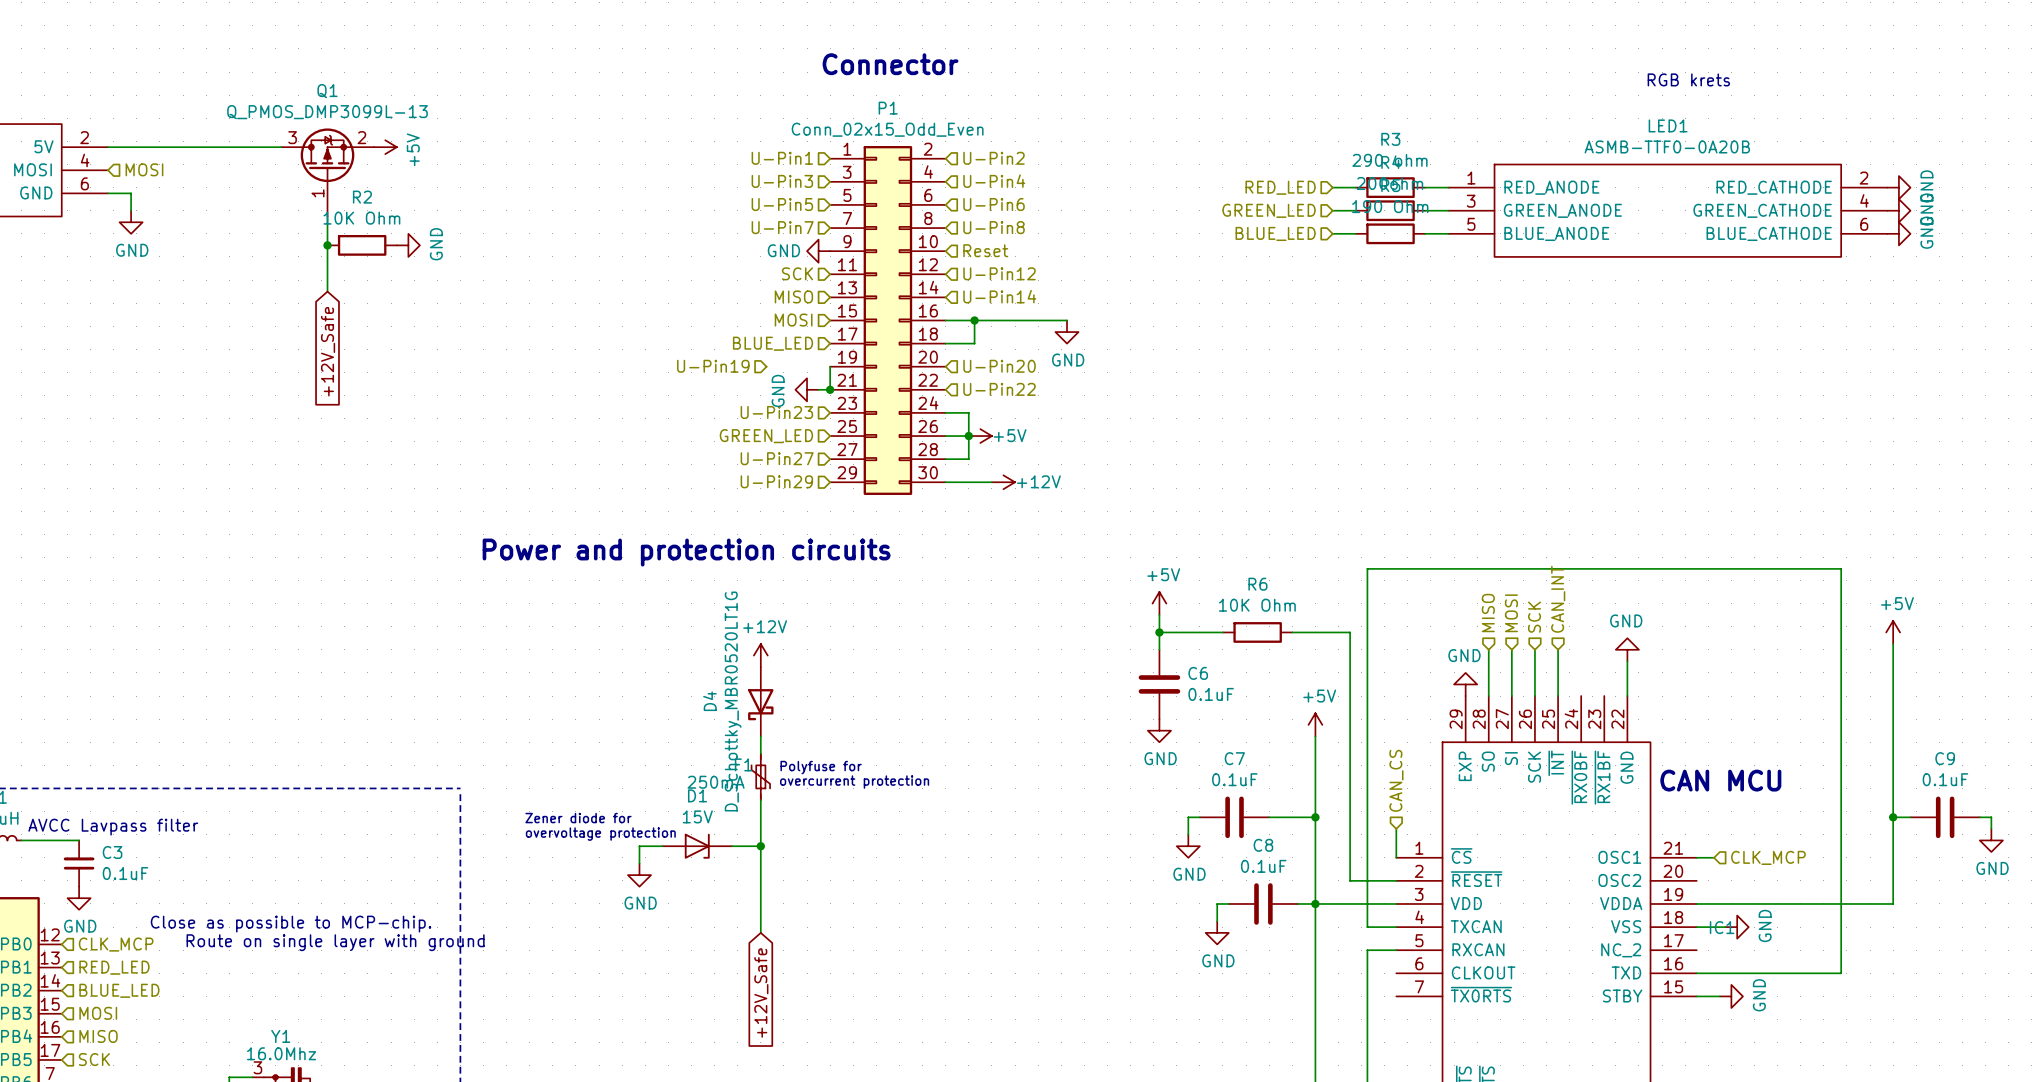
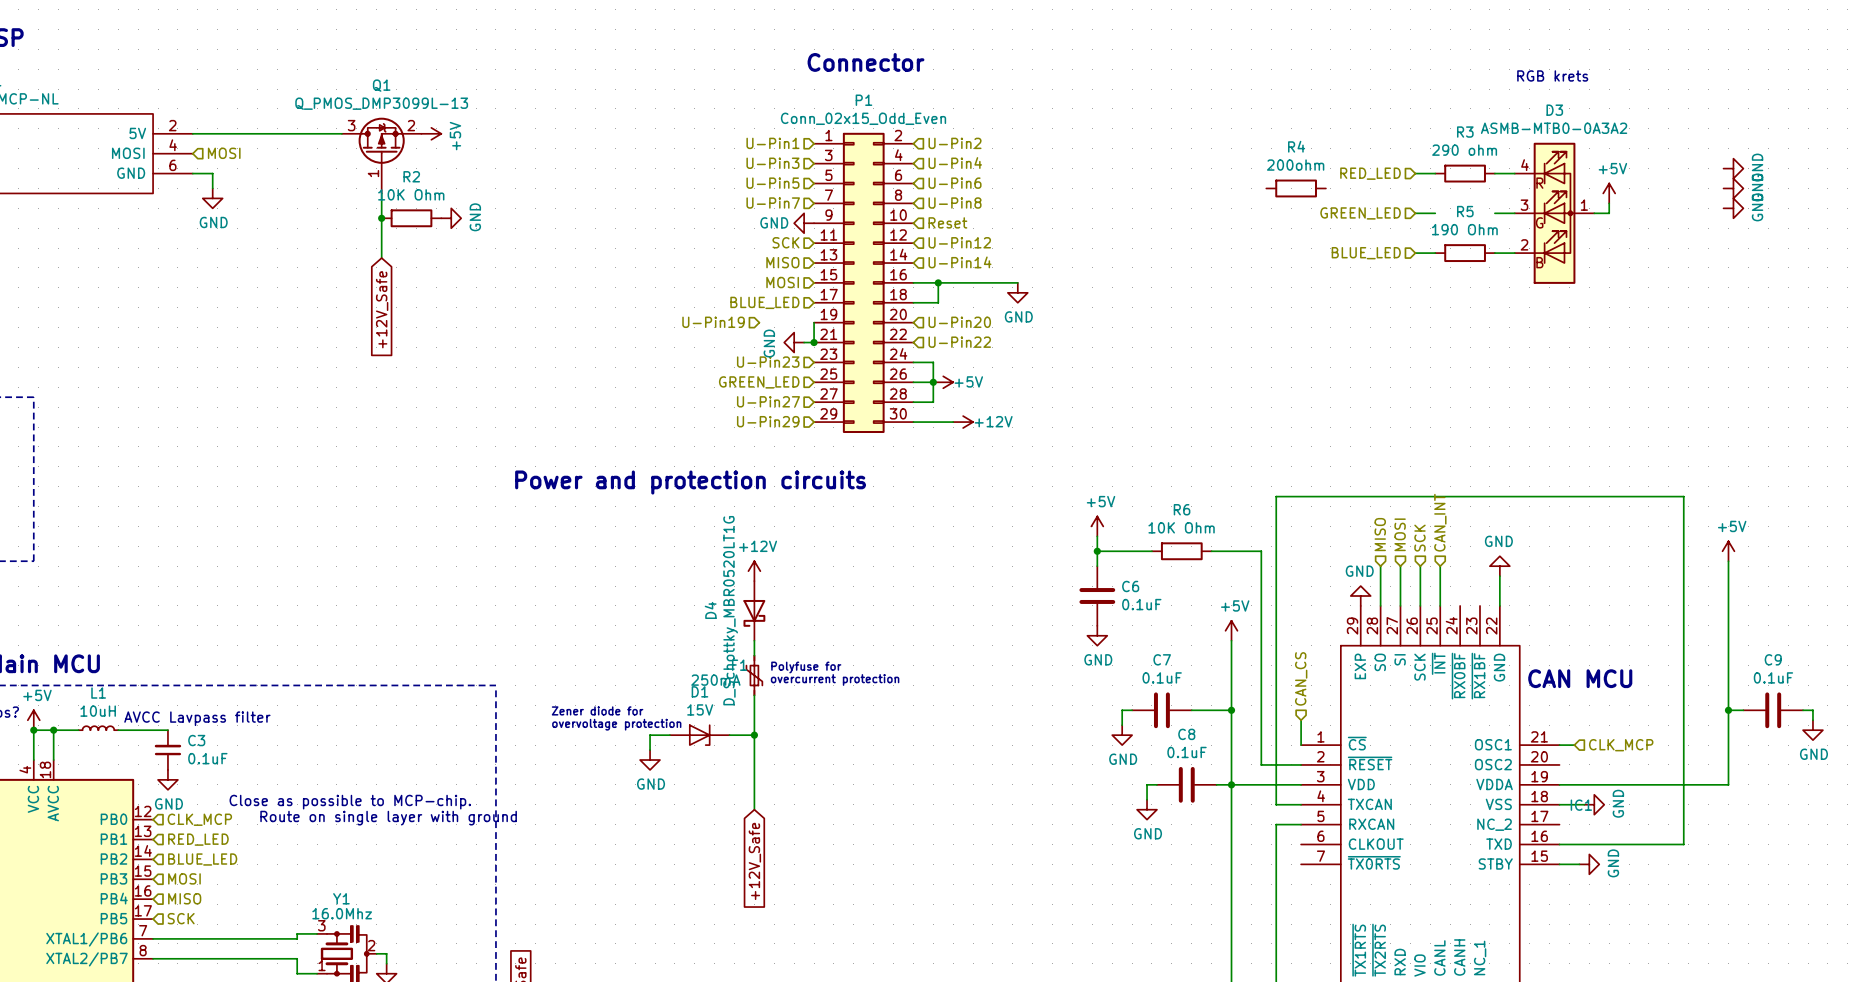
hierarchical label position: RED_LED (1280, 187) -> RED_LED (1370, 173)
wire: (1332, 187) (1355, 187) -> (1415, 173) (1435, 173)
R3 position: (1390, 187) -> (1465, 173)
wire: (1425, 187) (1448, 187) -> (1494, 173) (1514, 173)
hierarchical label position: GREEN_LED (1269, 210) -> GREEN_LED (1360, 213)
wire: (1332, 210) (1355, 210) -> (1415, 253) (1435, 253)
wire: (1425, 210) (1448, 210) -> (1494, 253) (1514, 253)
LED1: ASMB-TTF0-0A20B (1667, 210) -> none
power symbol: none -> +5V (1609, 193)
wire: none -> (1609, 203) (1609, 213) (1594, 213)
hierarchical label position: BLUE_LED (1275, 233) -> BLUE_LED (1366, 253)
wire: (1332, 233) (1355, 233) -> (1415, 213) (1435, 213)
R5 position: (1390, 233) -> (1465, 253)
wire: (1425, 233) (1448, 233) -> (1494, 213) (1514, 213)
D3: none -> ASMB-MTB0-0A3A2 (1554, 213)

